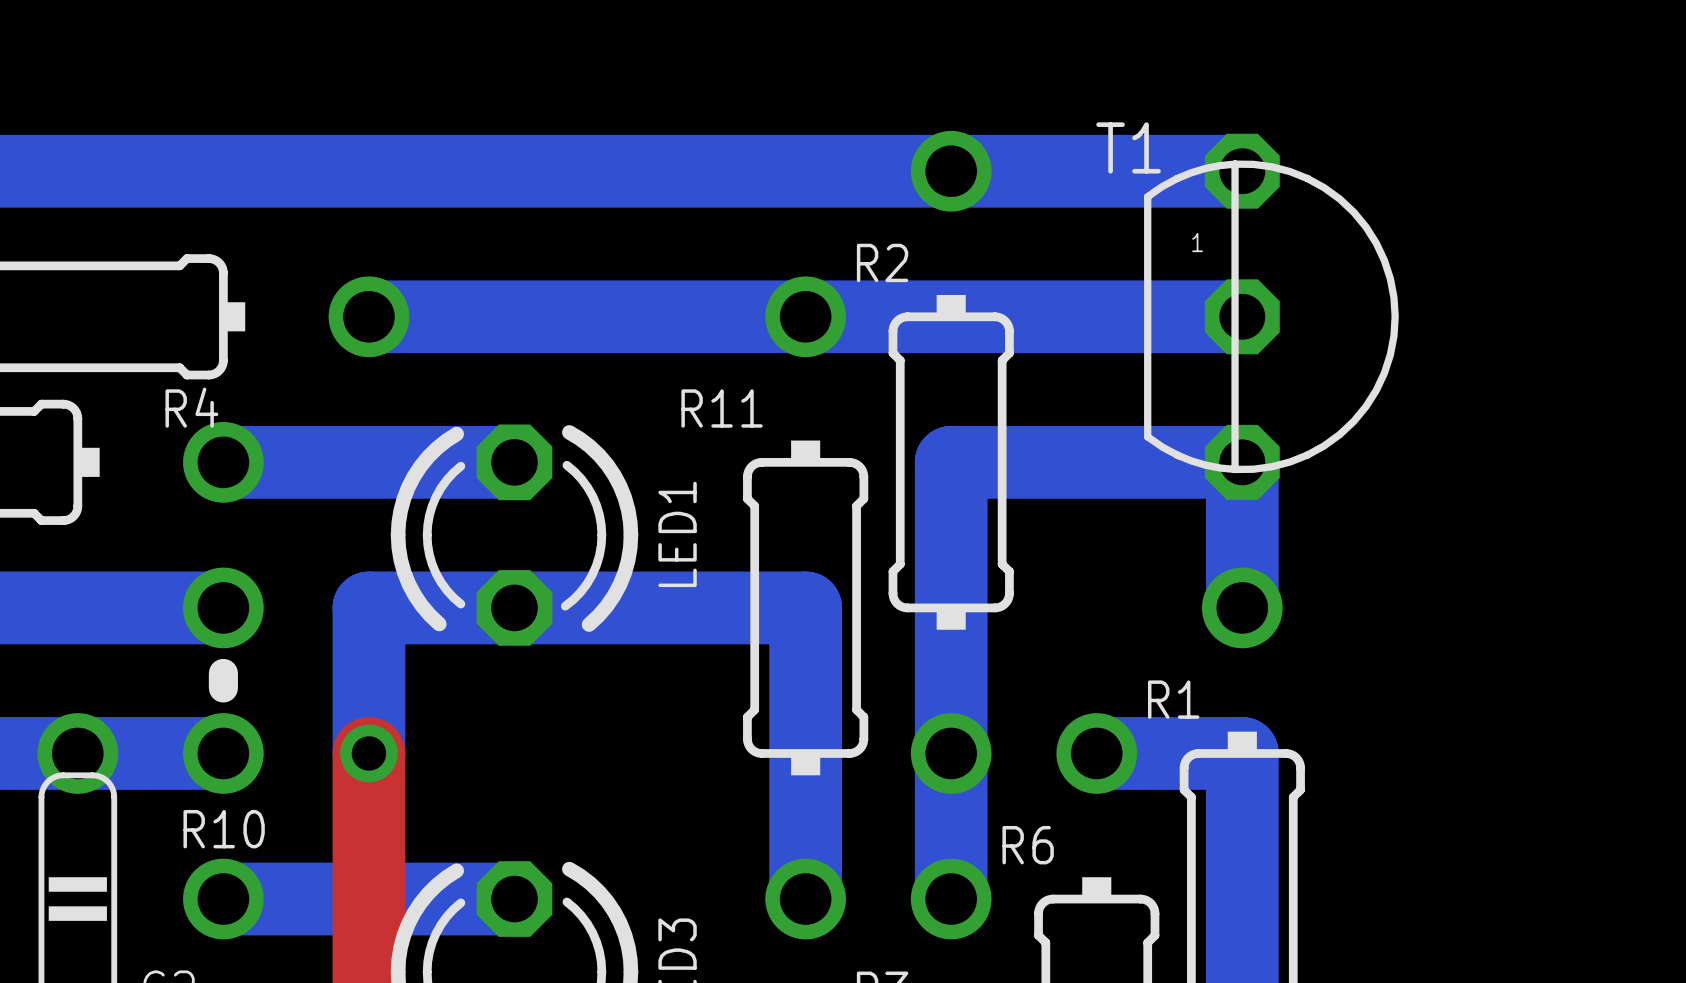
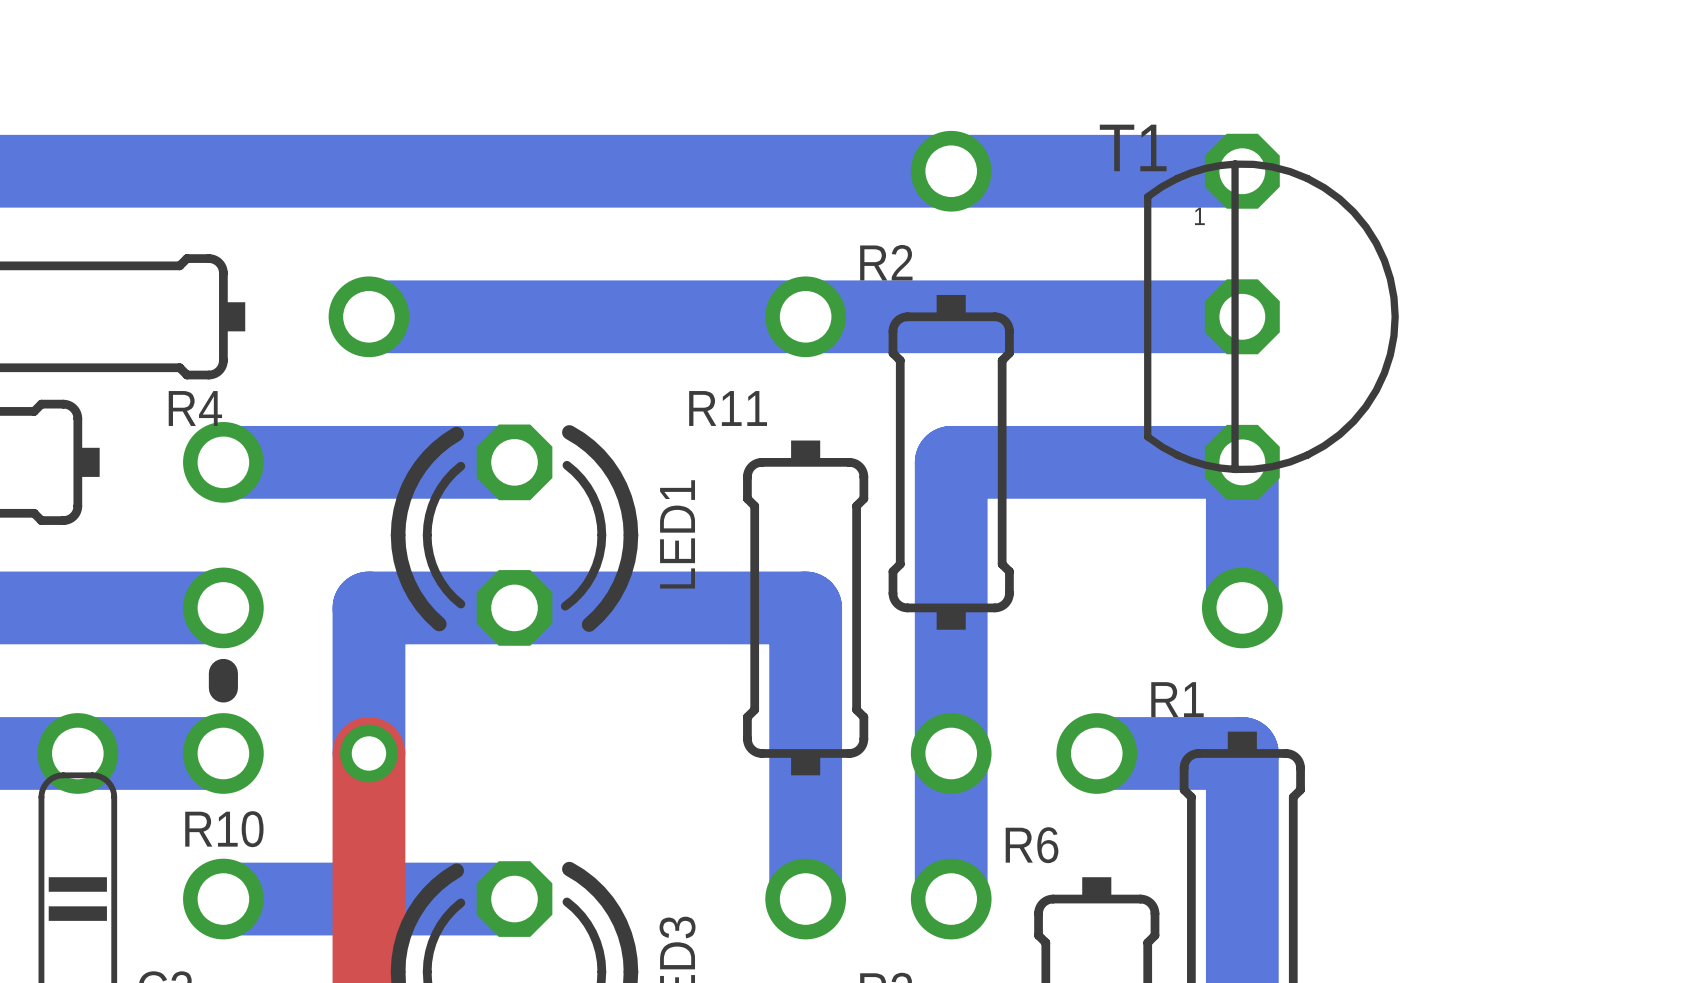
T1 text: none -> 1 (1199, 216)
T1 text: 1 (1197, 242) -> none

